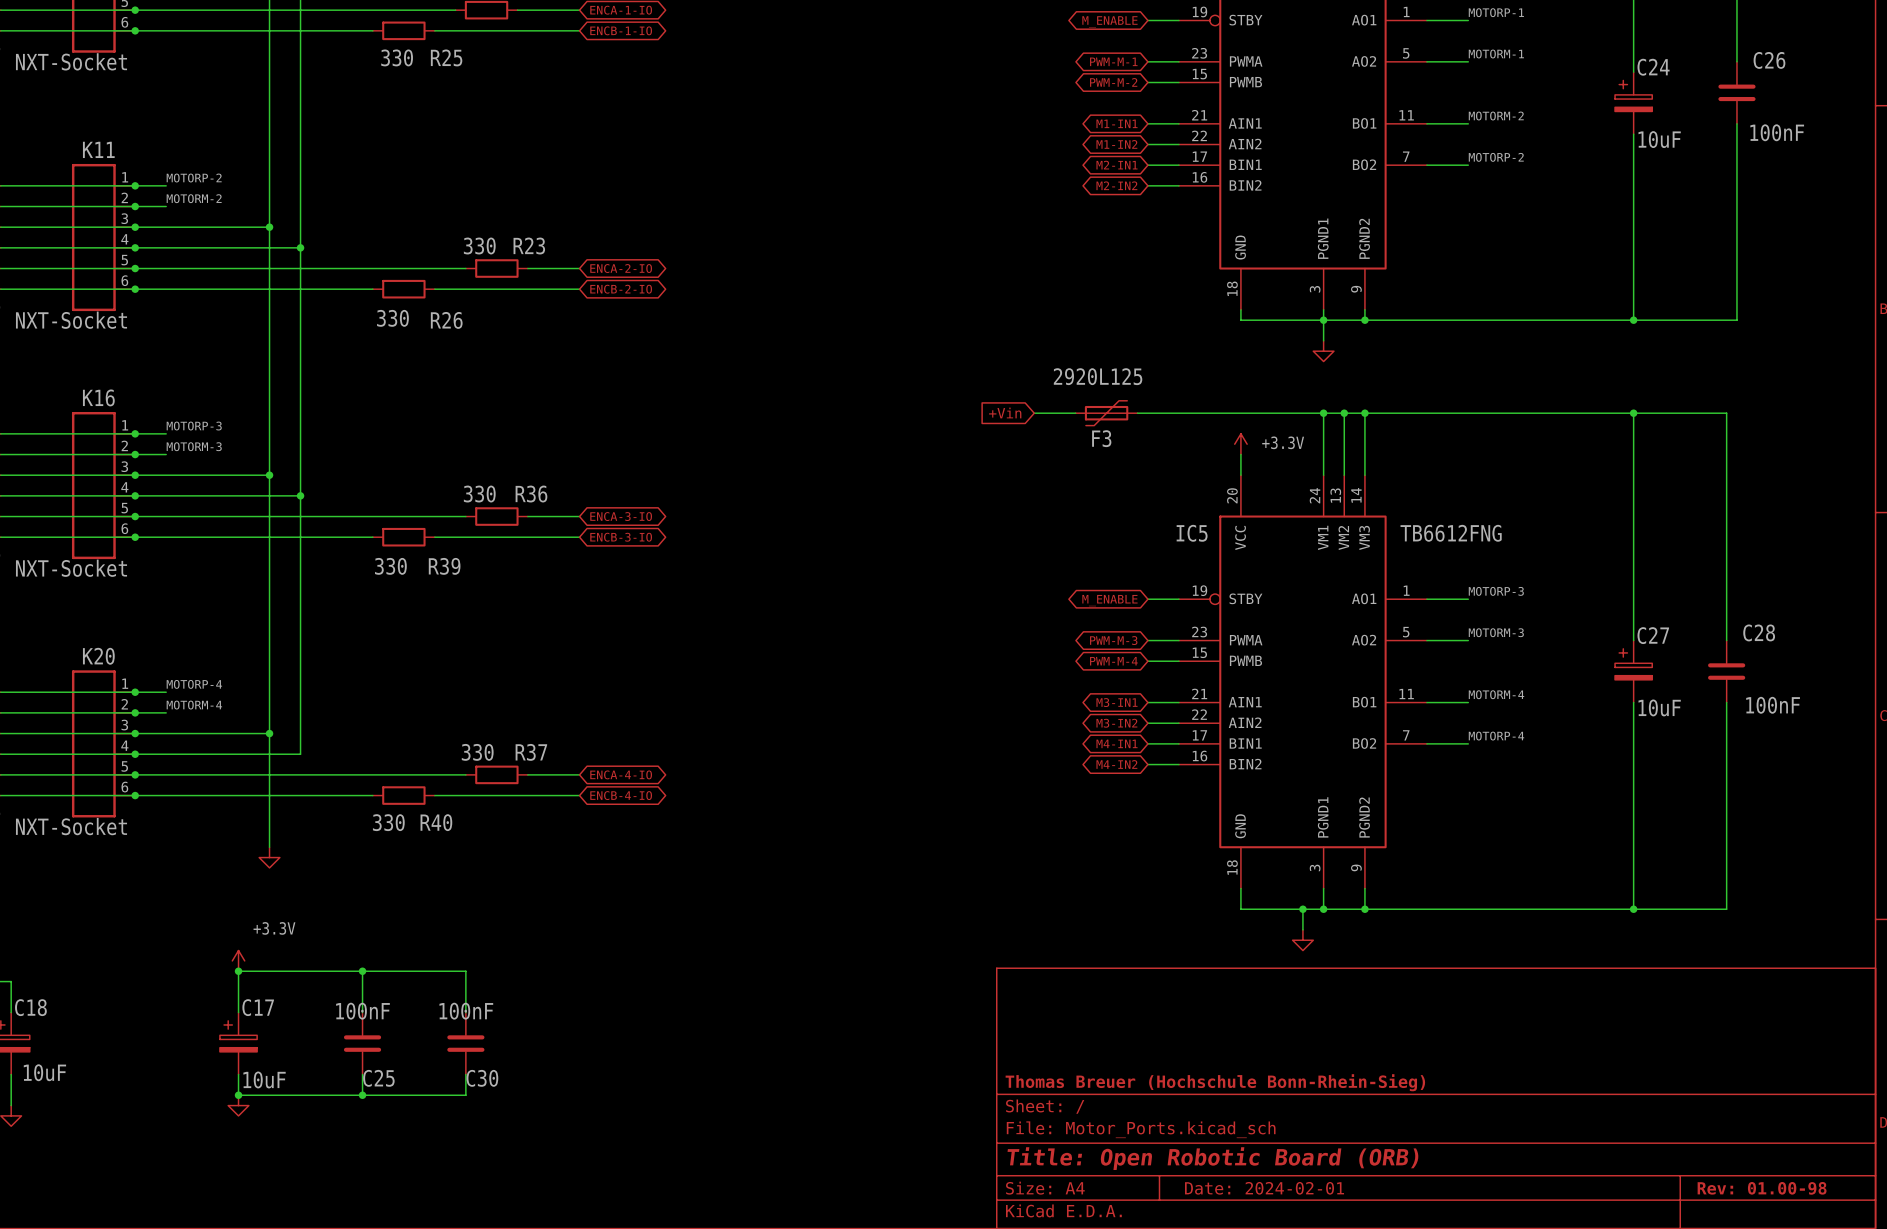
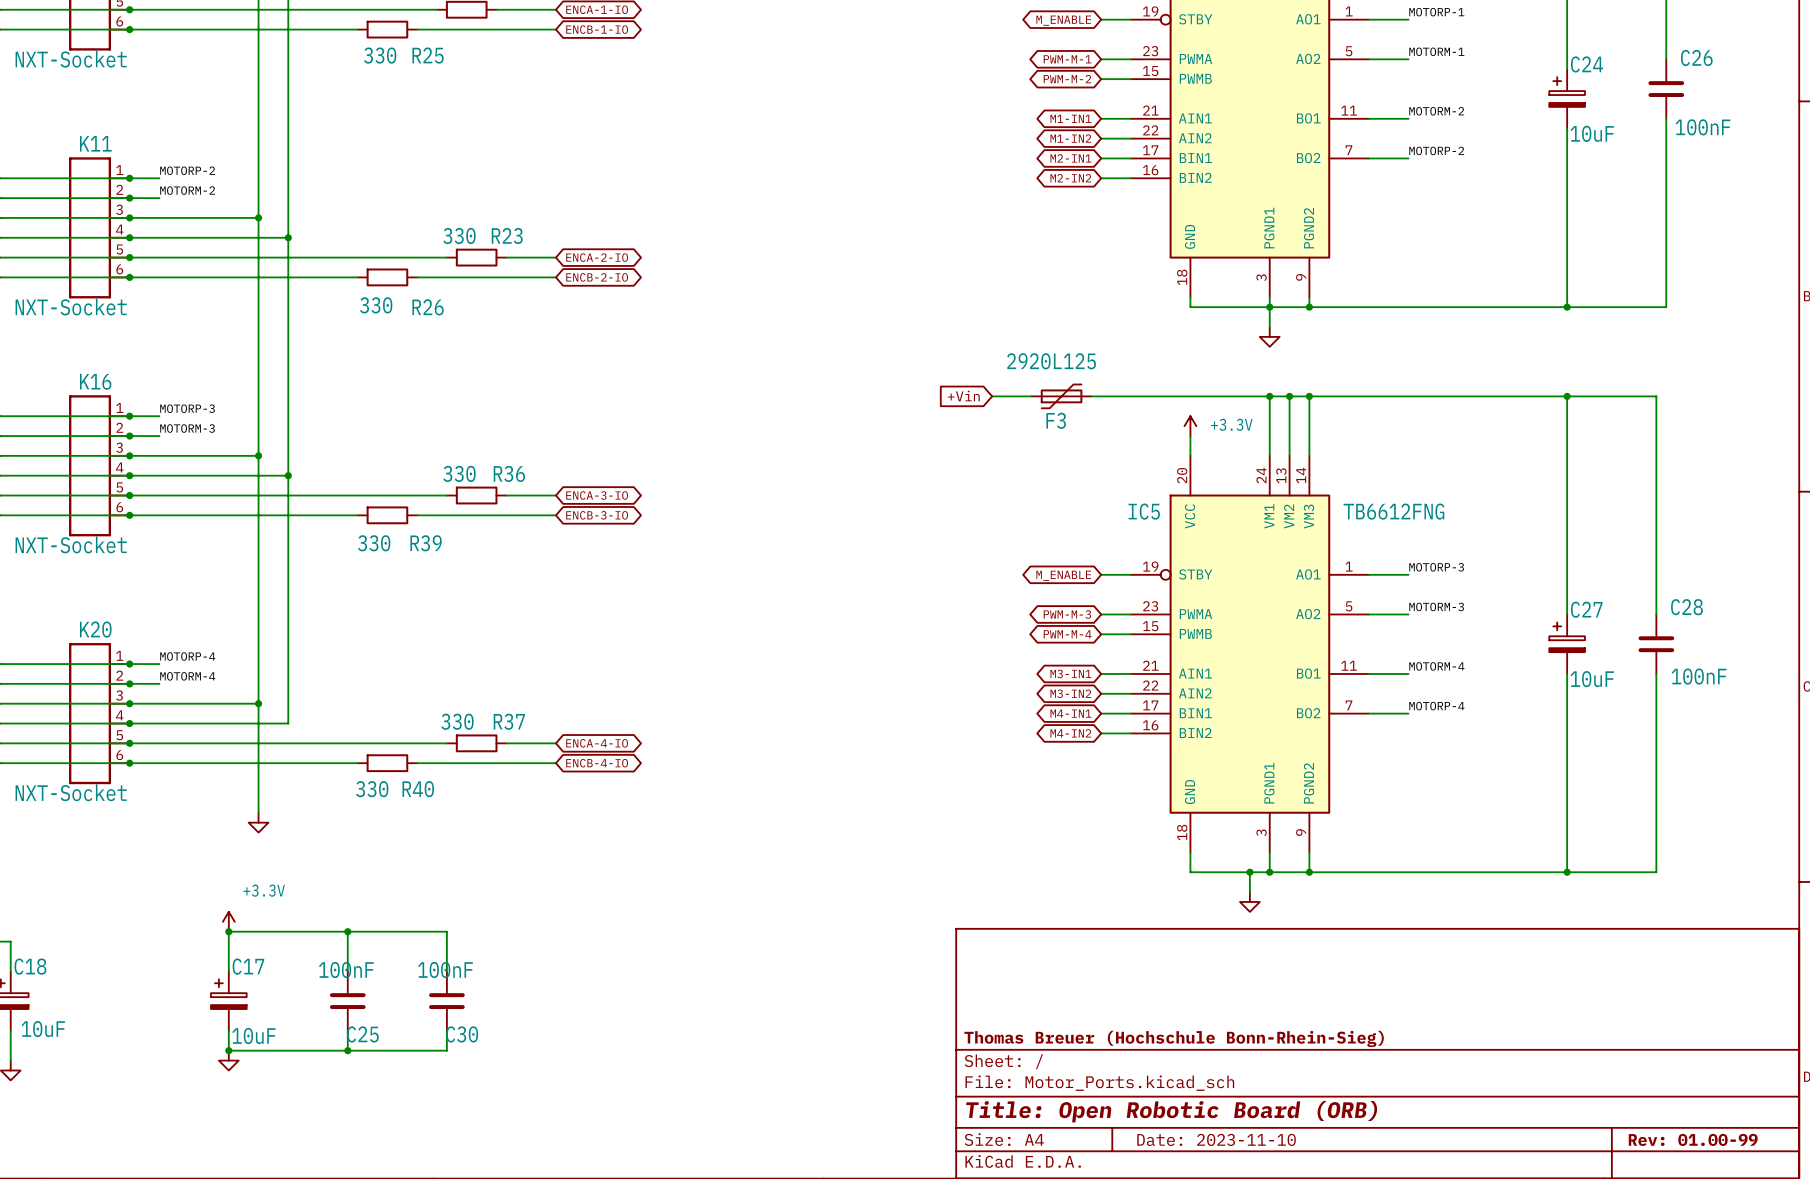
title block: Date: 2024-02-01 (1264, 1188) -> Date: 2023-11-10 (1216, 1139)
title block: Rev: 01.00-98 (1762, 1188) -> Rev: 01.00-99 (1693, 1139)

